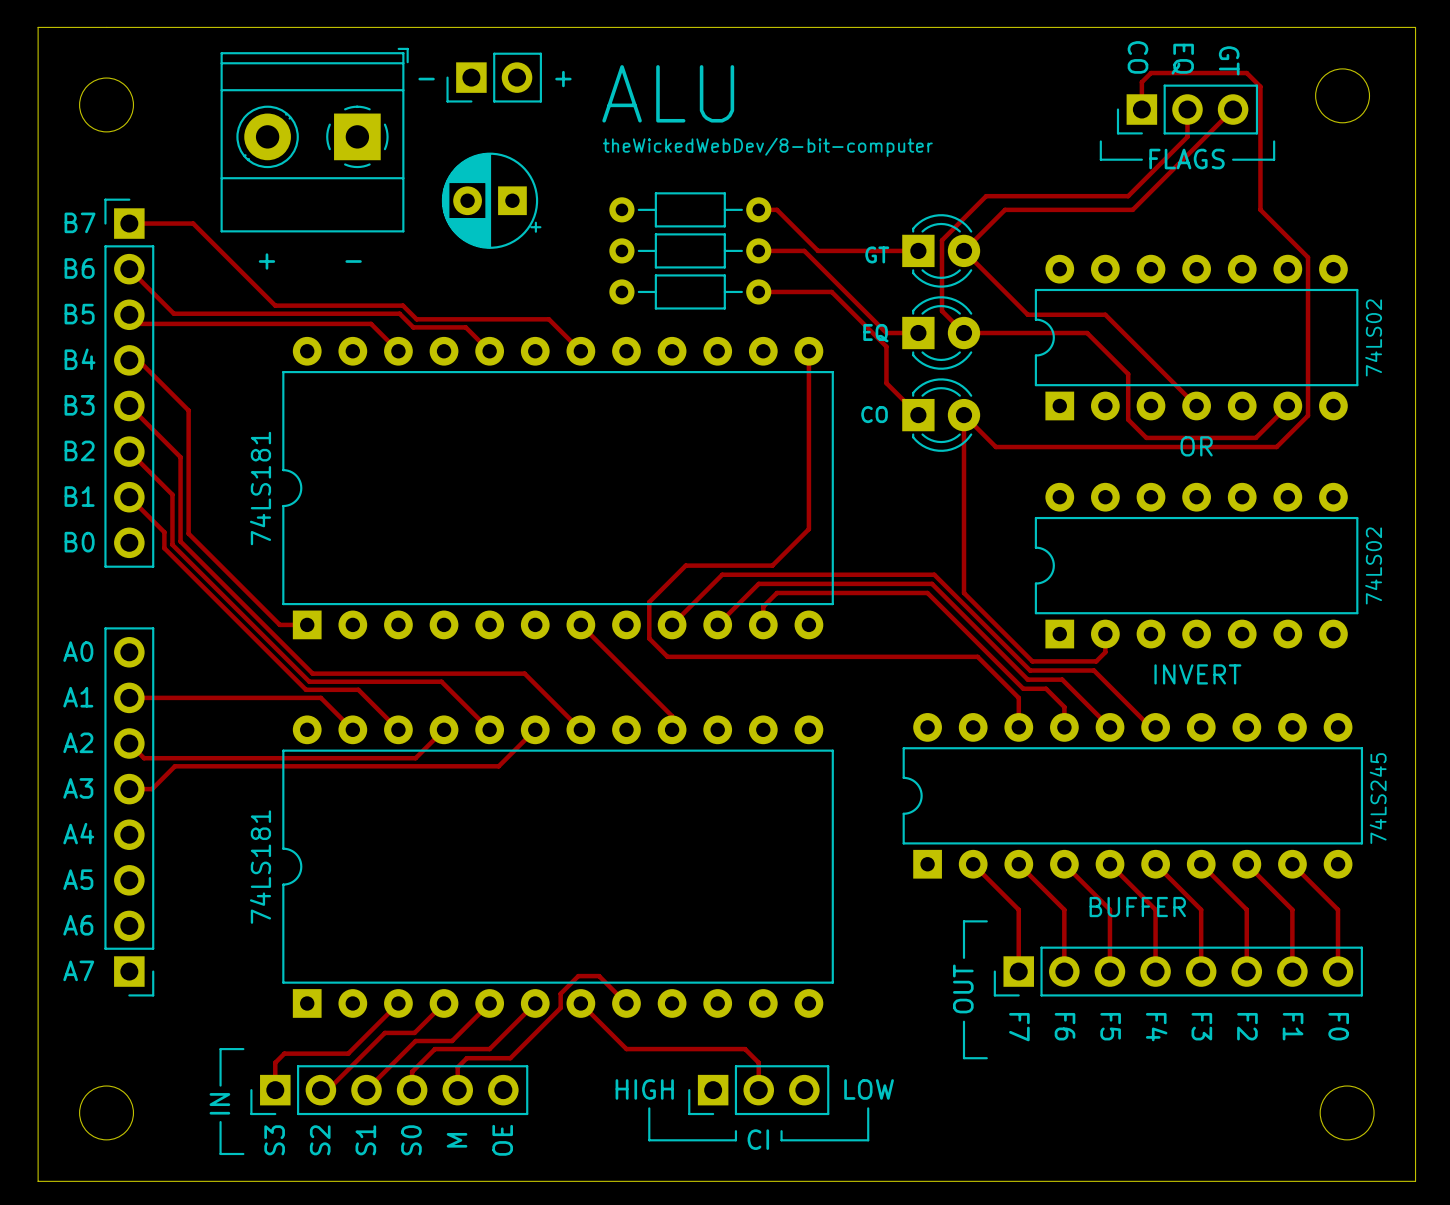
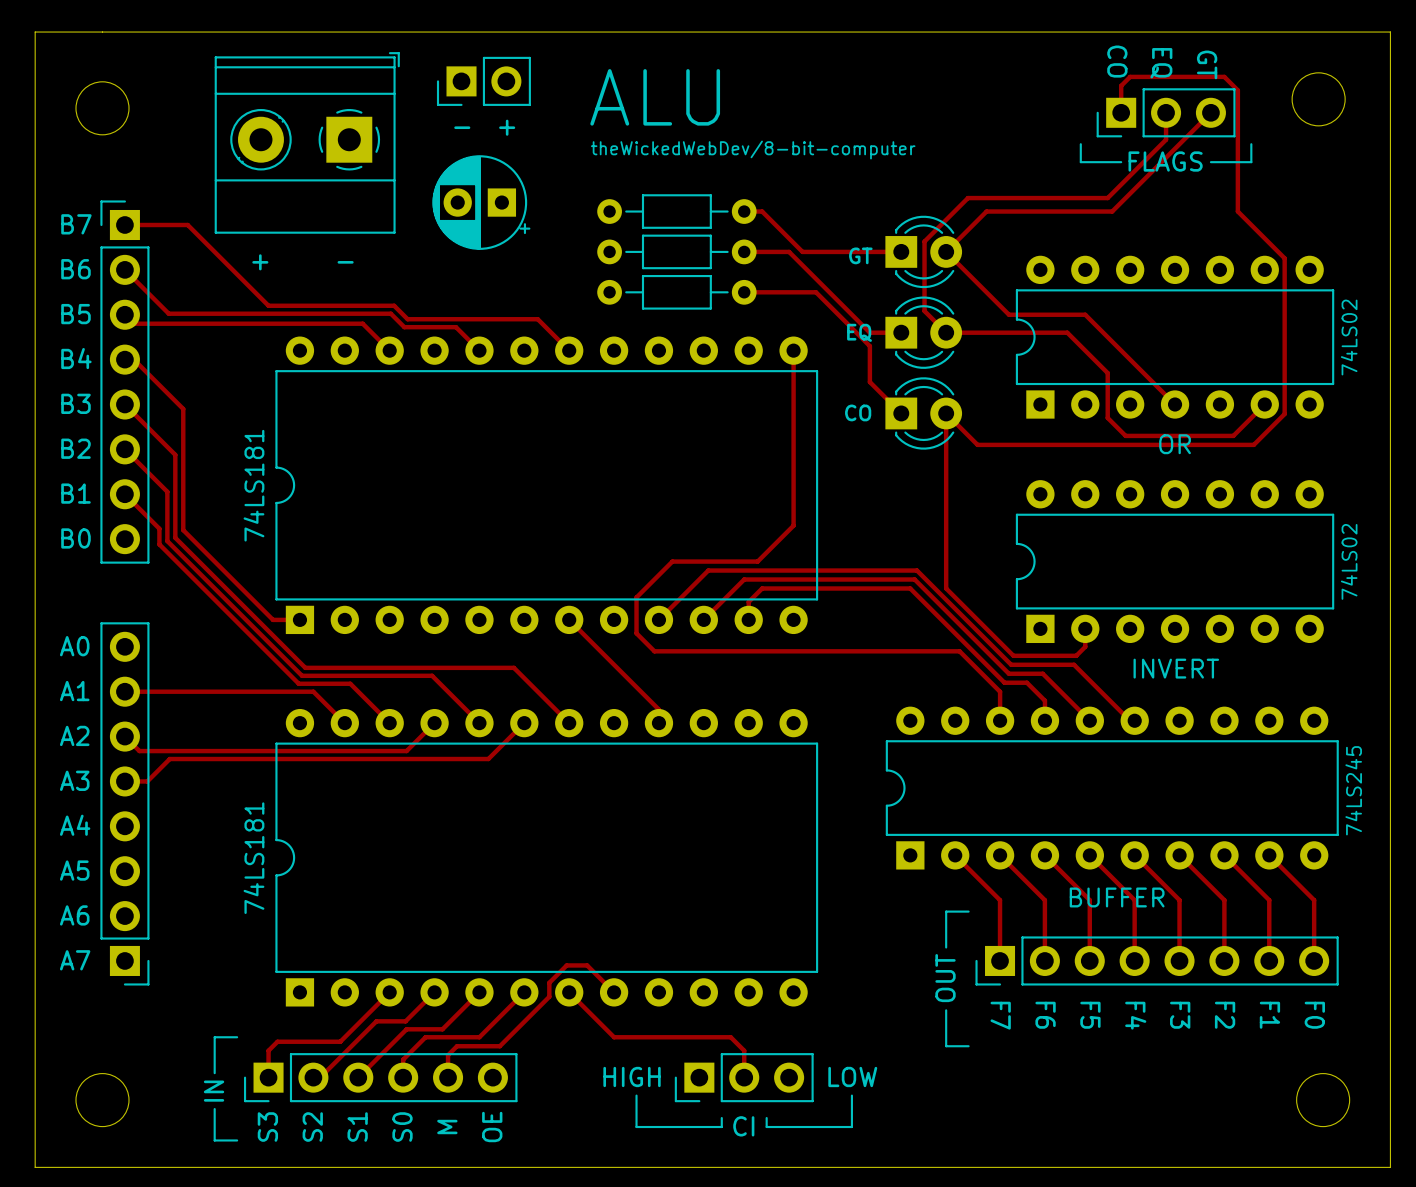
text position: - (426, 79) -> - (462, 127)
text position: + (563, 79) -> + (507, 127)

